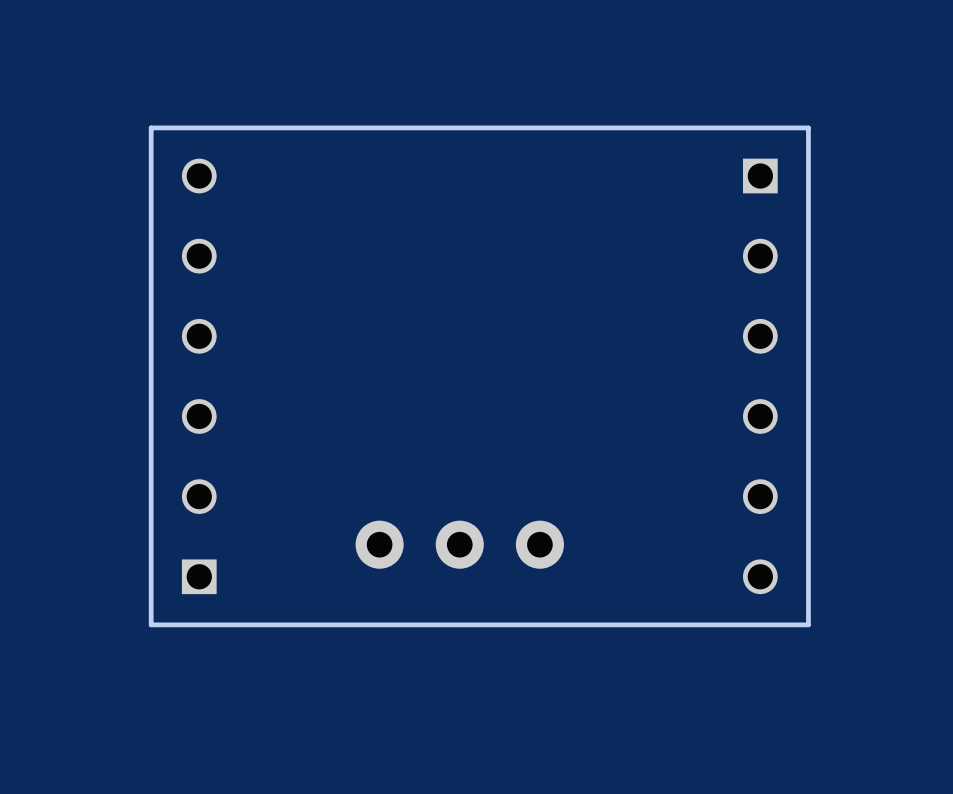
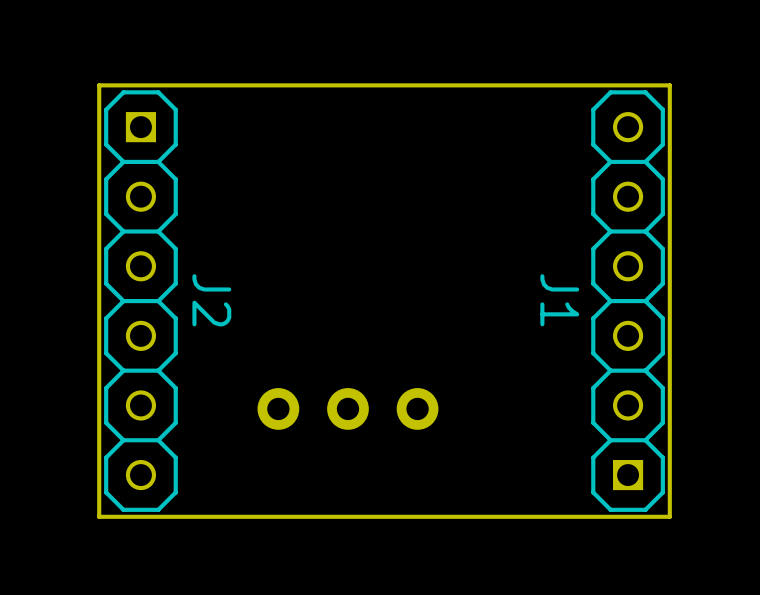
J2 side: top (199, 376) -> bottom (140, 301)
J1 side: top (760, 376) -> bottom (628, 301)
part position: (459, 544) -> (347, 408)

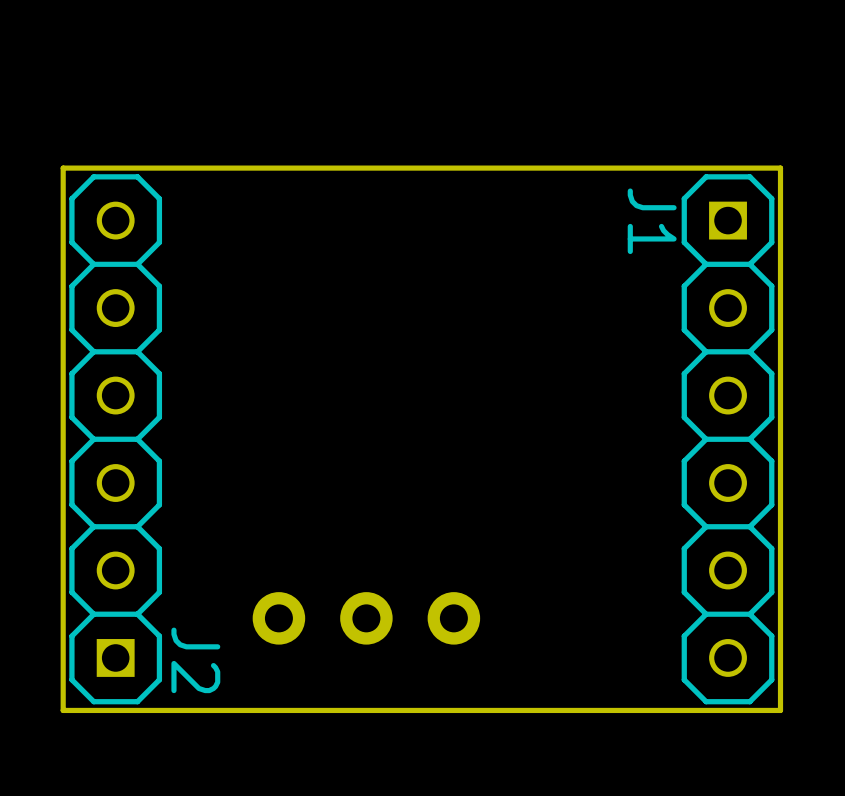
J2 name position: J2 (211, 300) -> J2 (195, 660)
J1 name position: J1 (559, 300) -> J1 (652, 221)
J2 rotation: 0° (140, 301) -> 180° (115, 439)
J1 rotation: 0° (628, 301) -> 180° (728, 439)
part position: (347, 408) -> (366, 618)

